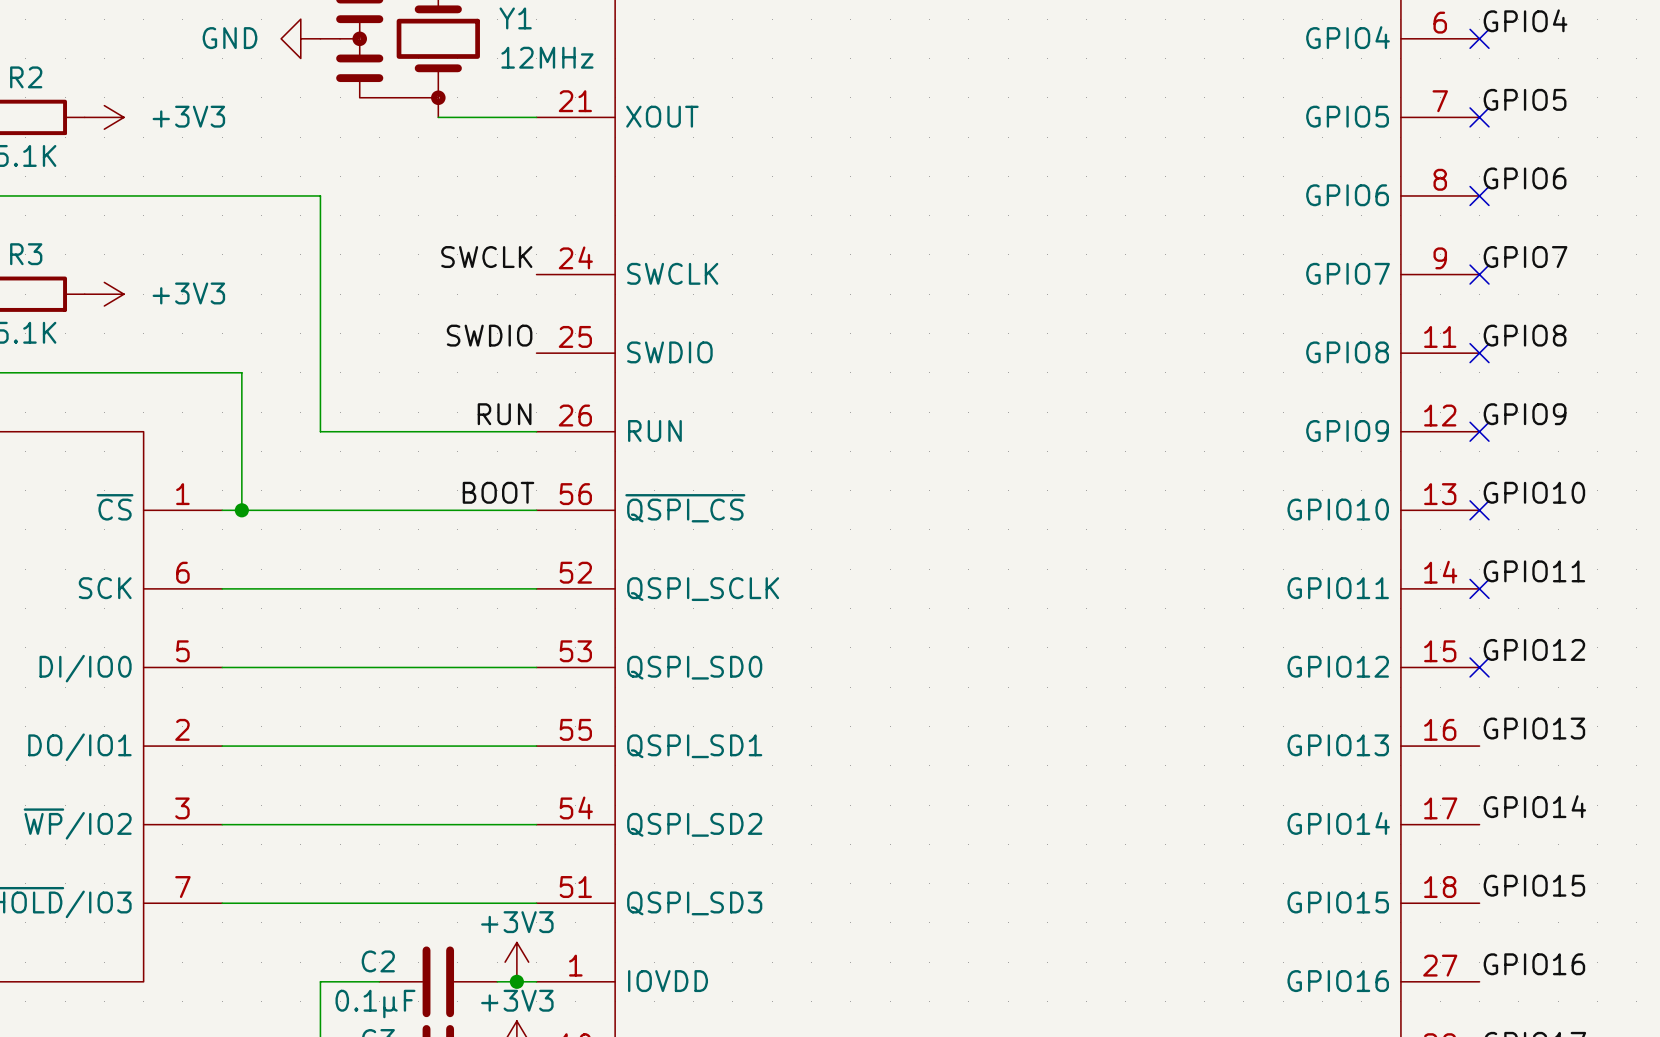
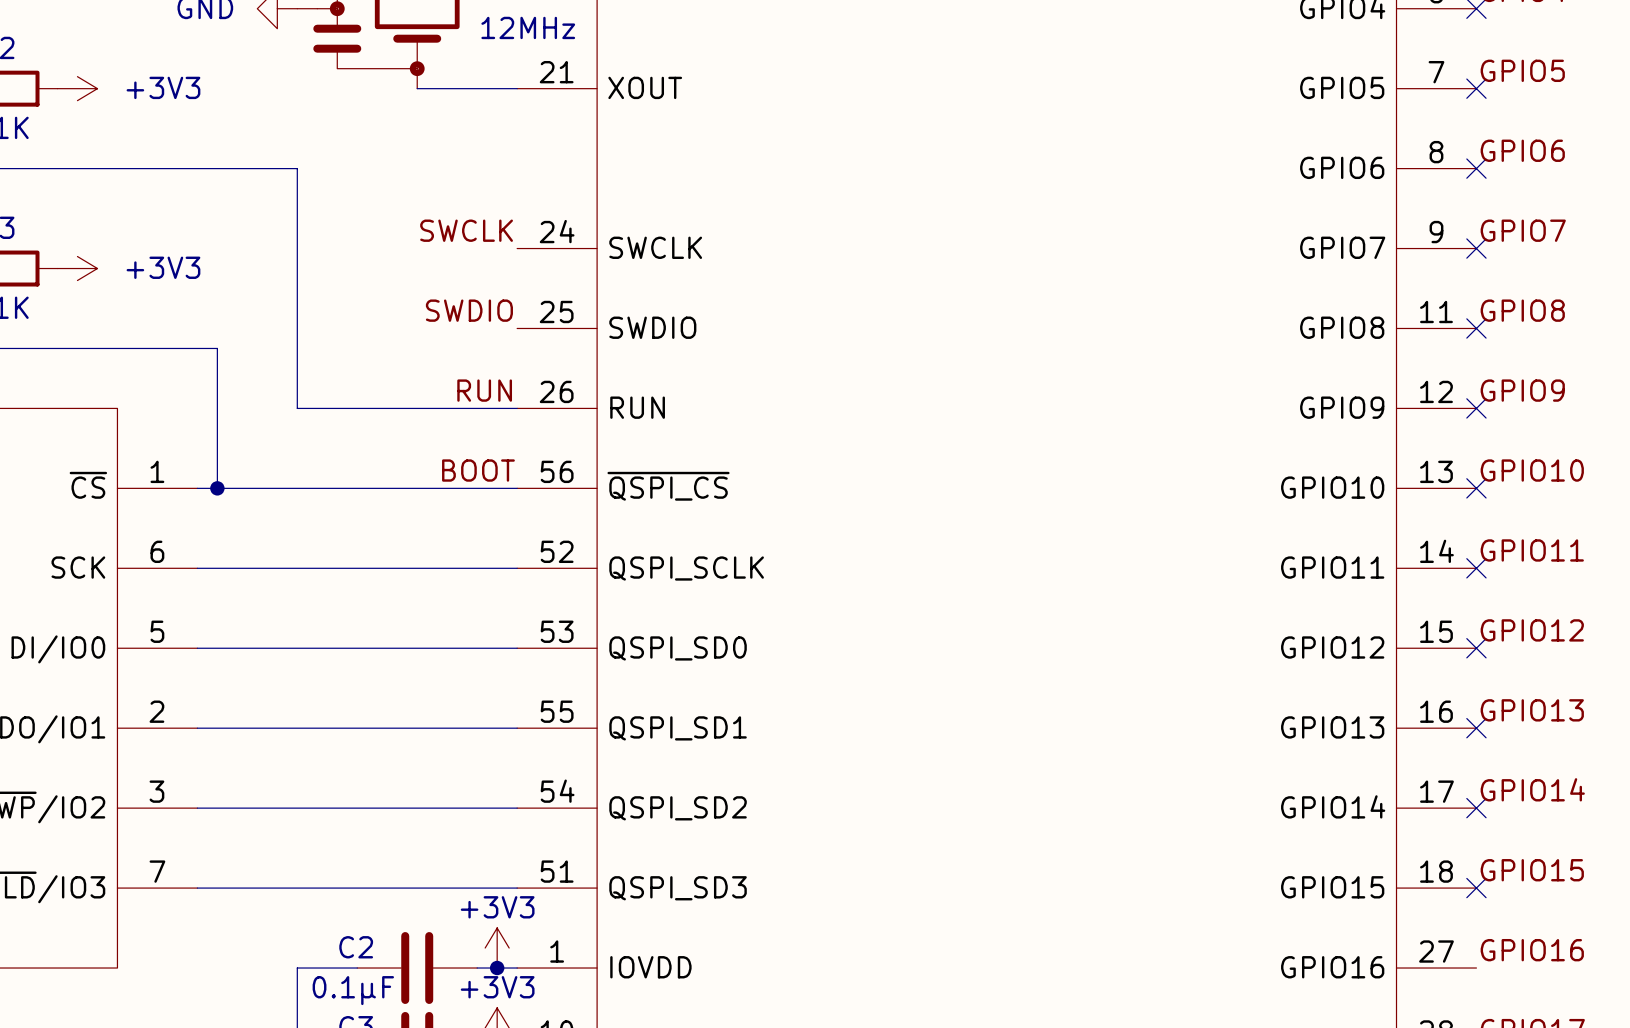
no-connect mark: none -> (1476, 728)
no-connect mark: none -> (1476, 808)
no-connect mark: none -> (1476, 888)

